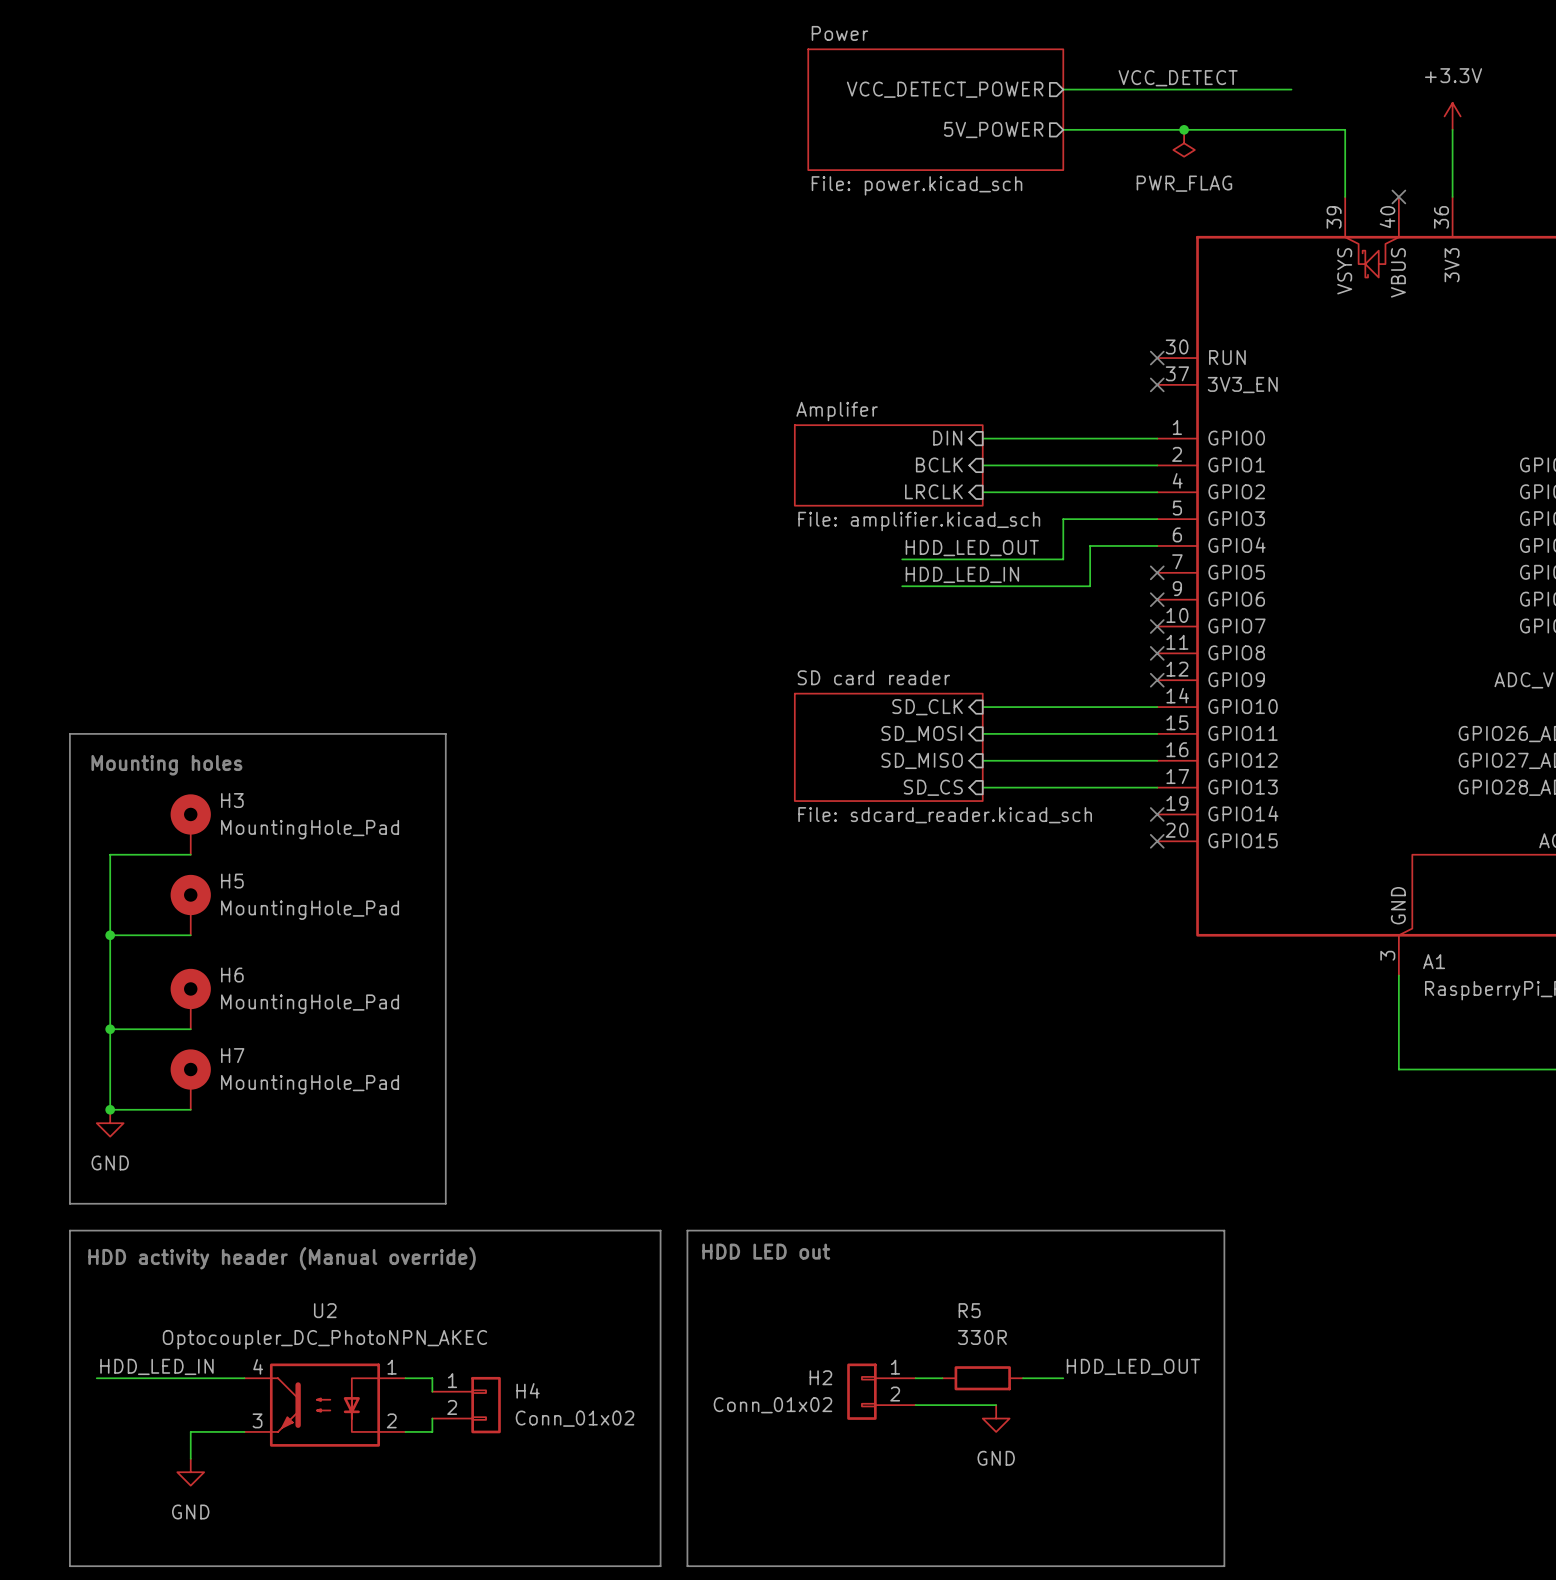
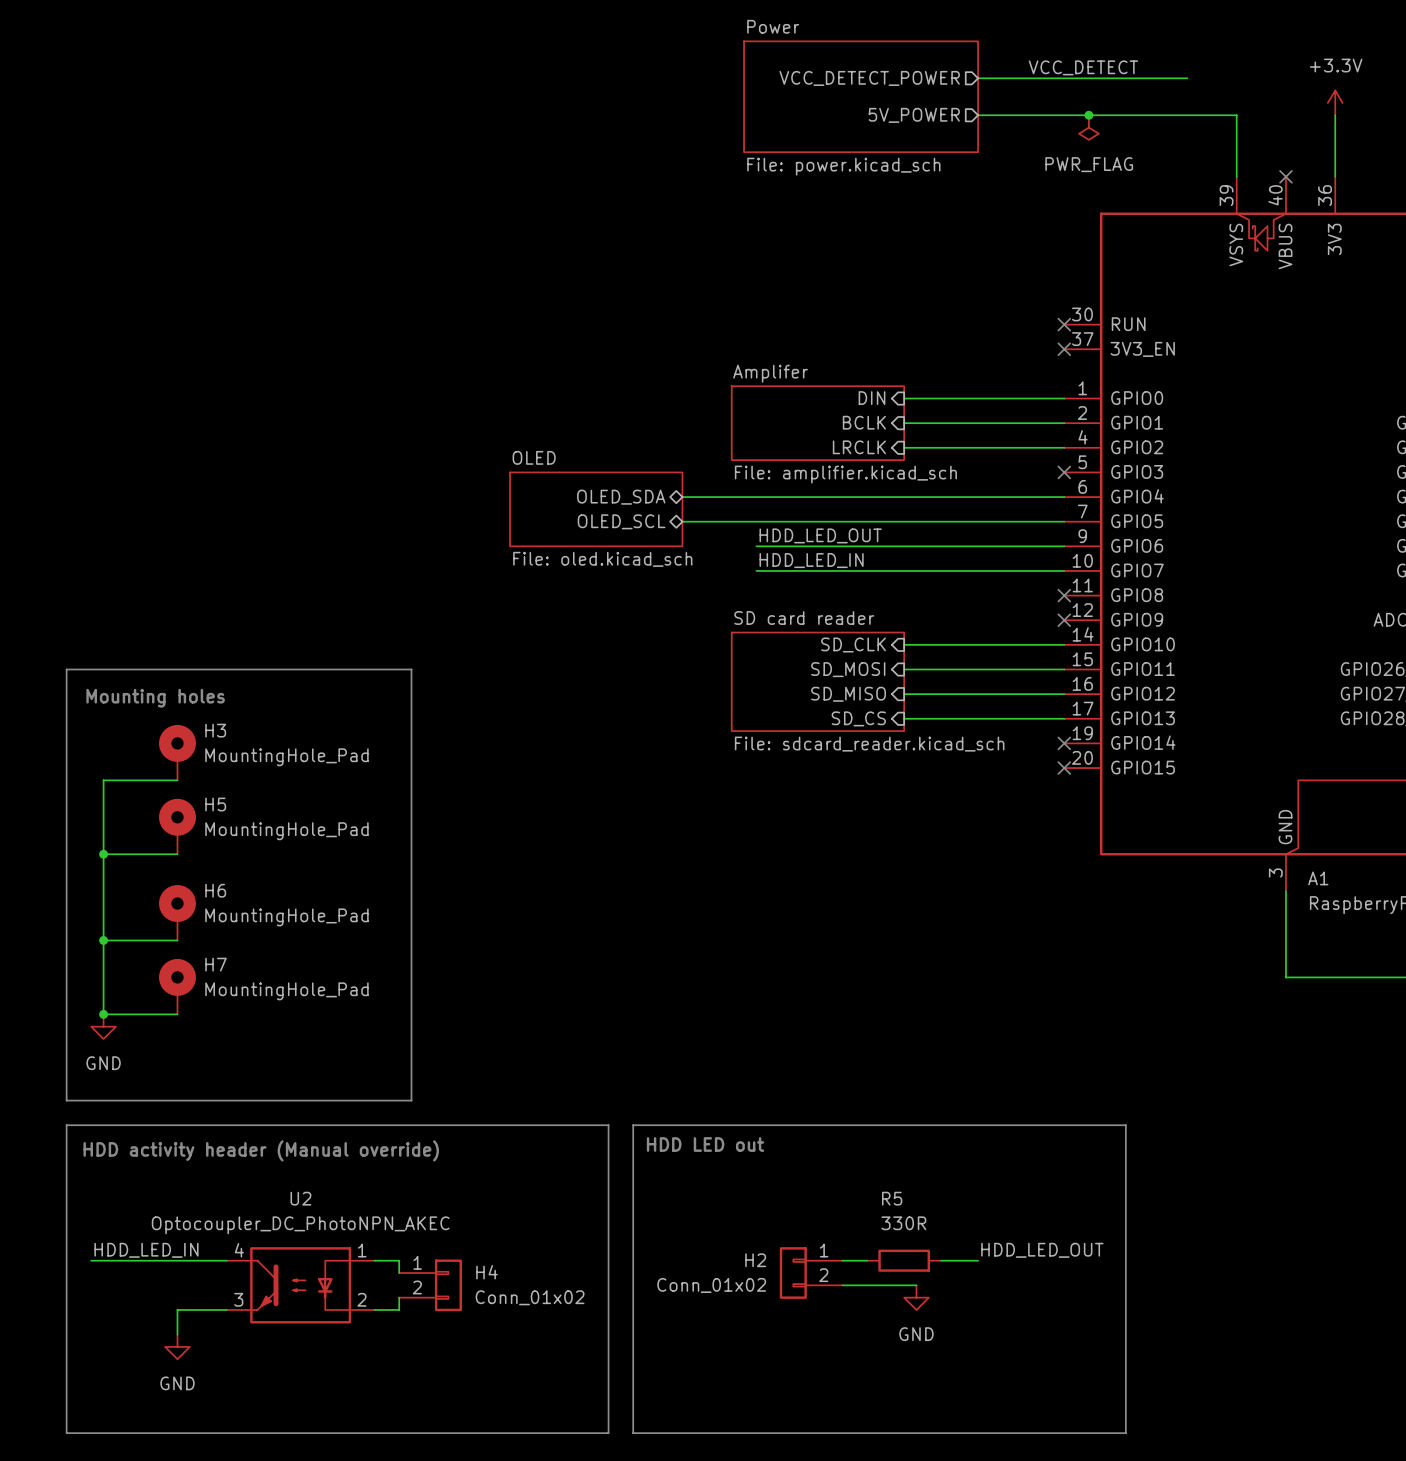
wire: (1157, 519) (1063, 519) (1063, 559) (902, 559) -> none
no-connect mark: none -> (1064, 472)
wire: (1090, 545) (1090, 586) (902, 586) -> (1002, 497) (682, 497)
sheet pin: none -> OLED_SDA (621, 497)
label position: HDD_LED_OUT (972, 548) -> HDD_LED_OUT (820, 535)
sheet OLED: none -> File: oled.kicad_sch (596, 509)
sheet pin: none -> OLED_SCL (621, 521)
wire: none -> (682, 521) (1064, 521)
no-connect mark: (1157, 572) -> none
label position: HDD_LED_IN (962, 574) -> HDD_LED_IN (811, 560)
wire: none -> (756, 546) (1064, 546)
no-connect mark: (1157, 599) -> none
wire: none -> (756, 570) (1064, 570)
no-connect mark: (1157, 626) -> none

